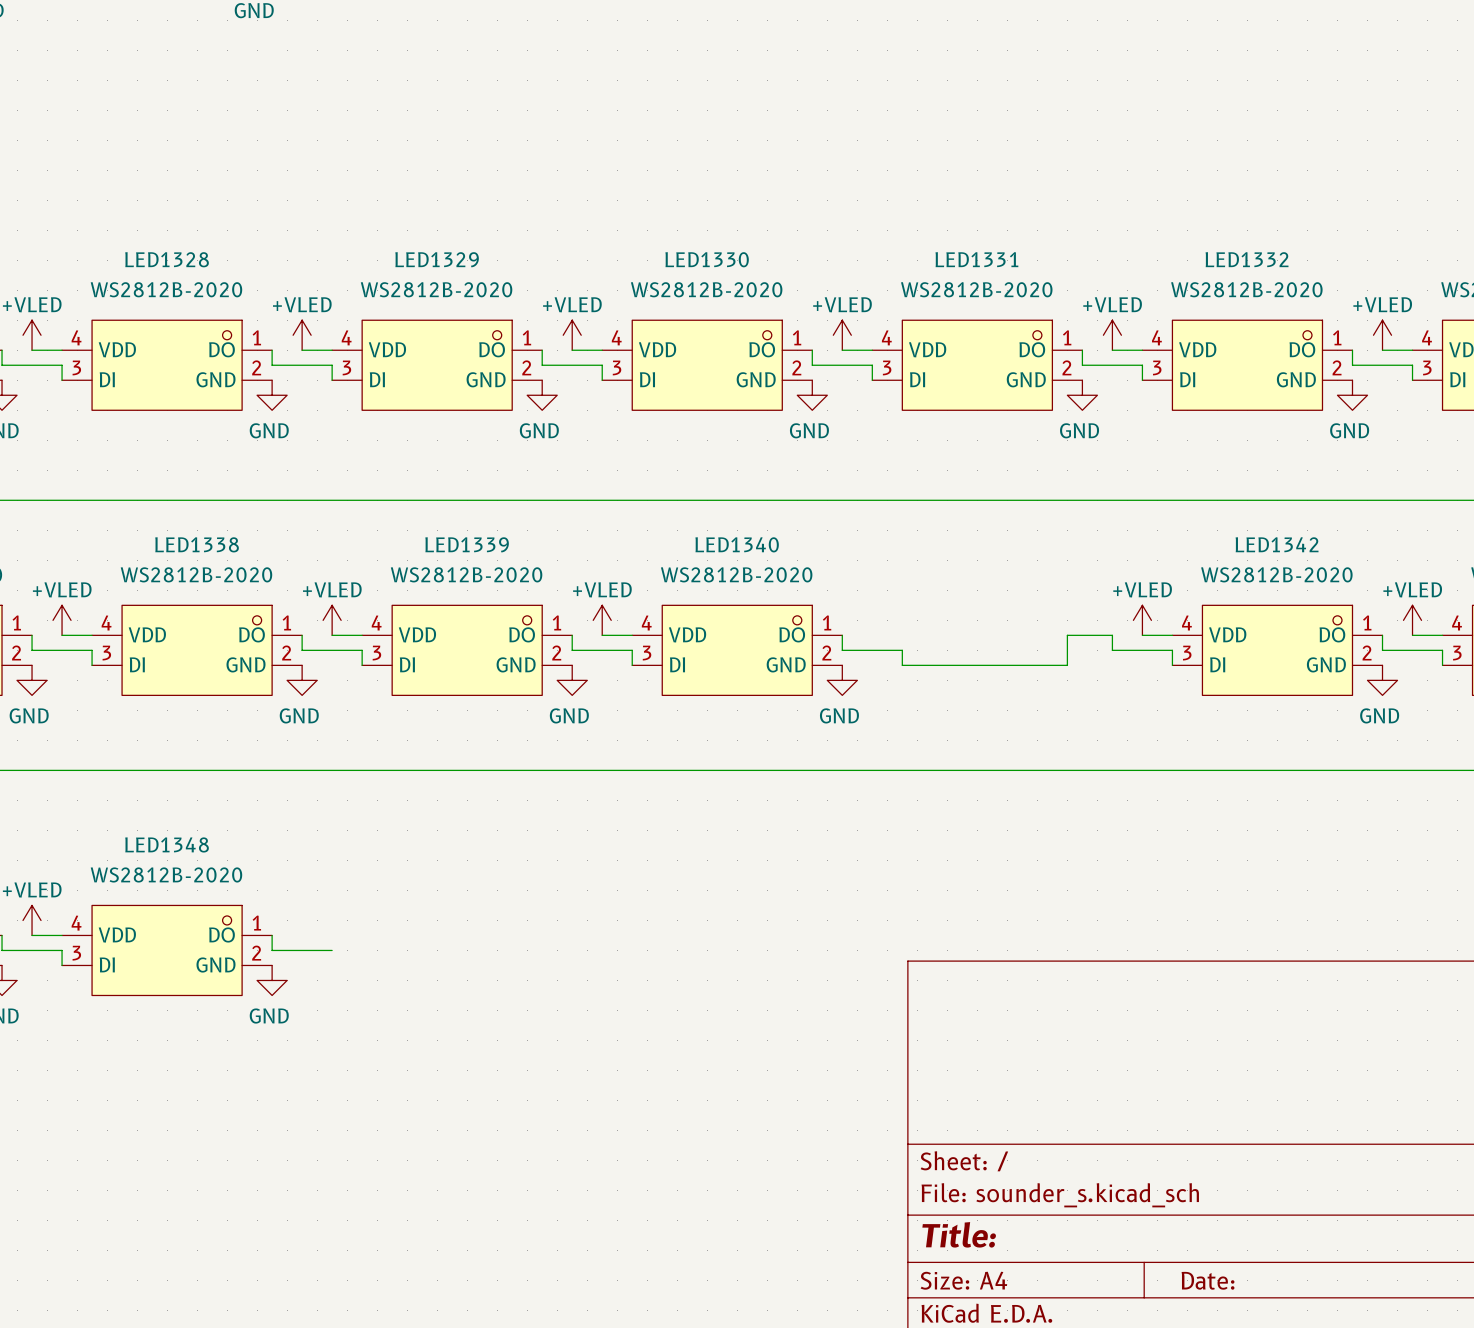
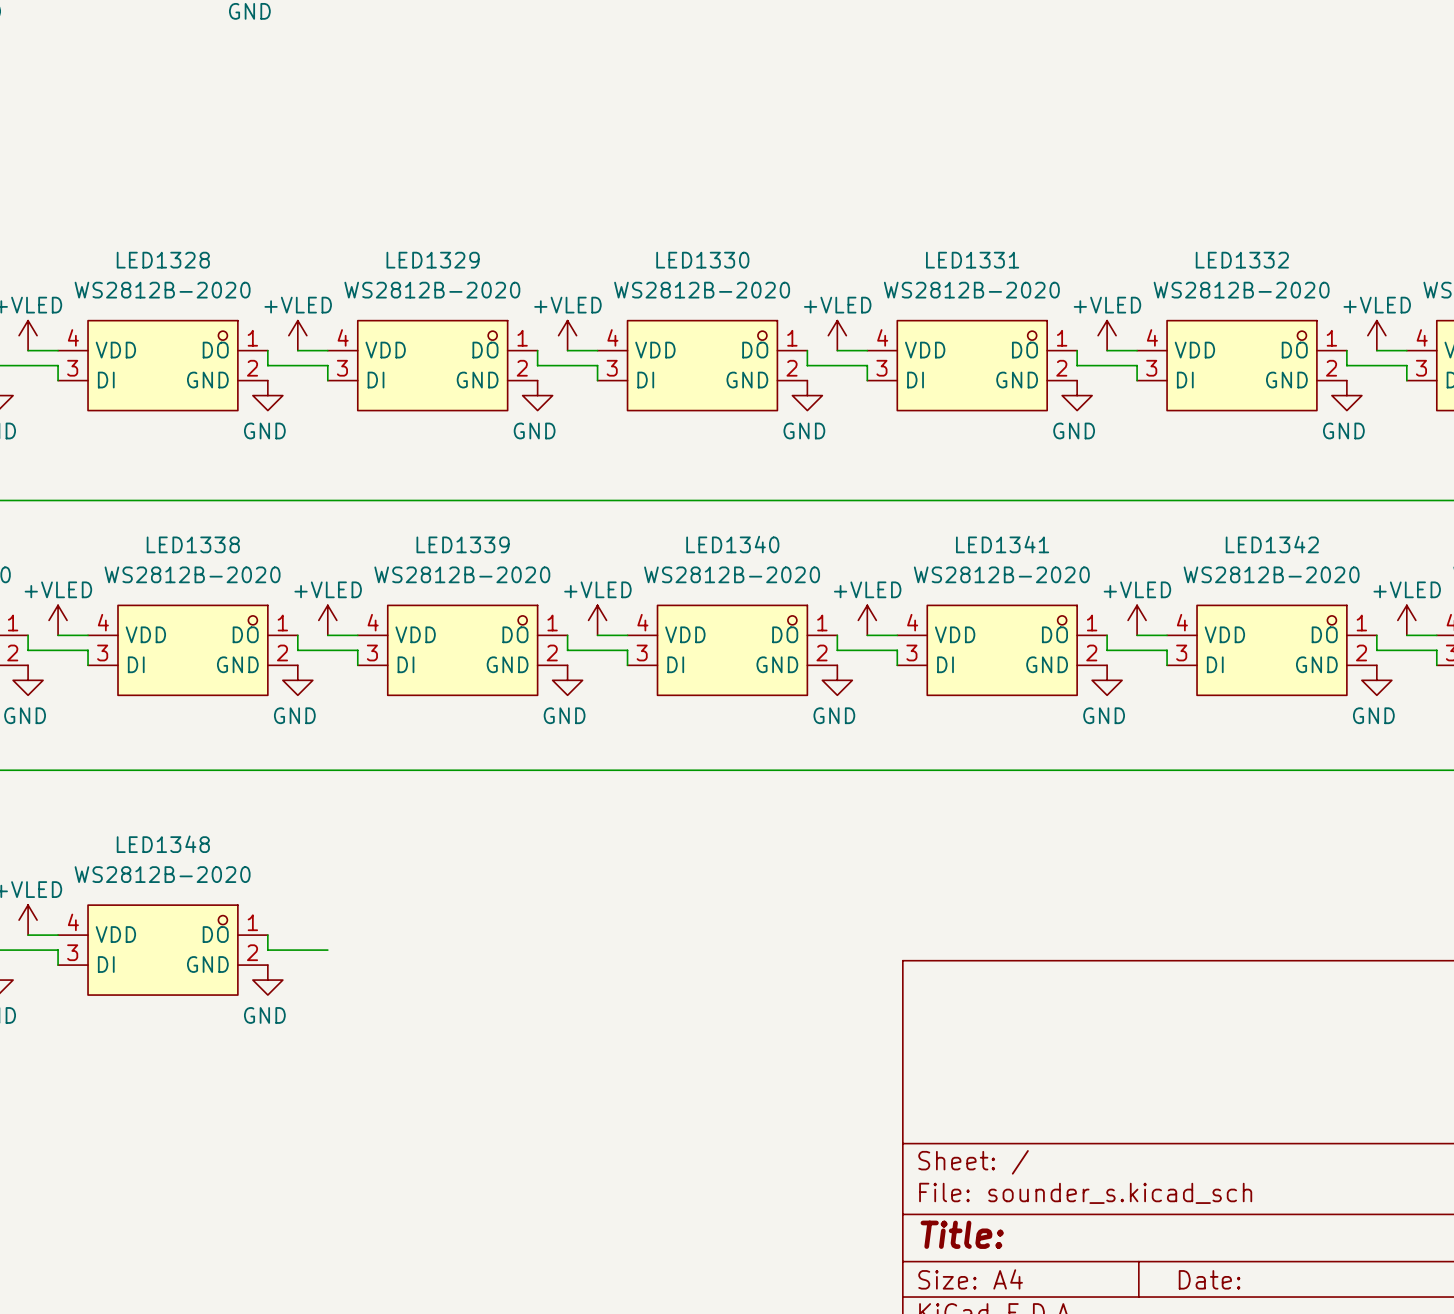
power symbol: none -> +VLED (867, 620)
wire: none -> (867, 635) (897, 635)
LED1341: none -> WS2812B-2020 (1002, 650)
power symbol: none -> GND (1107, 680)

